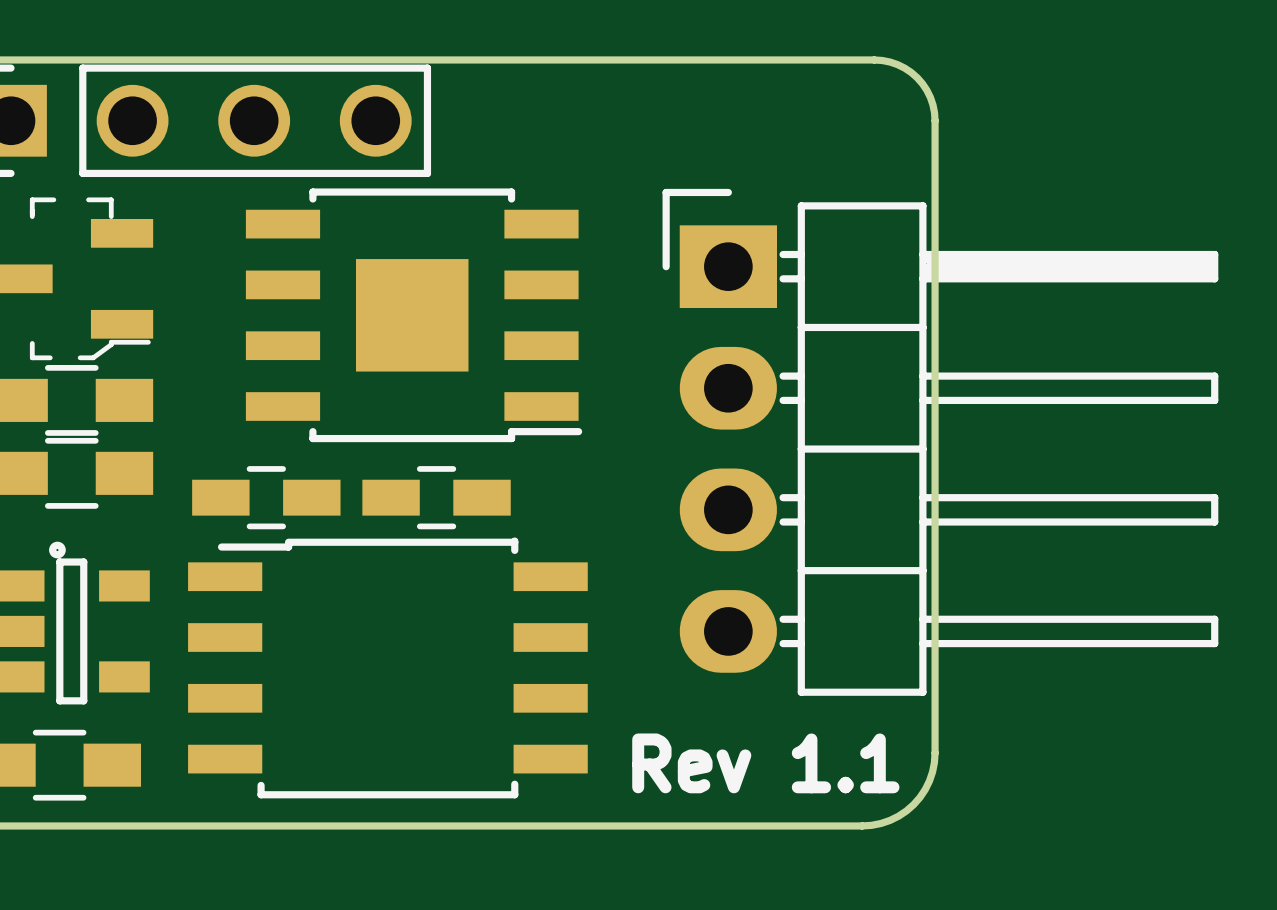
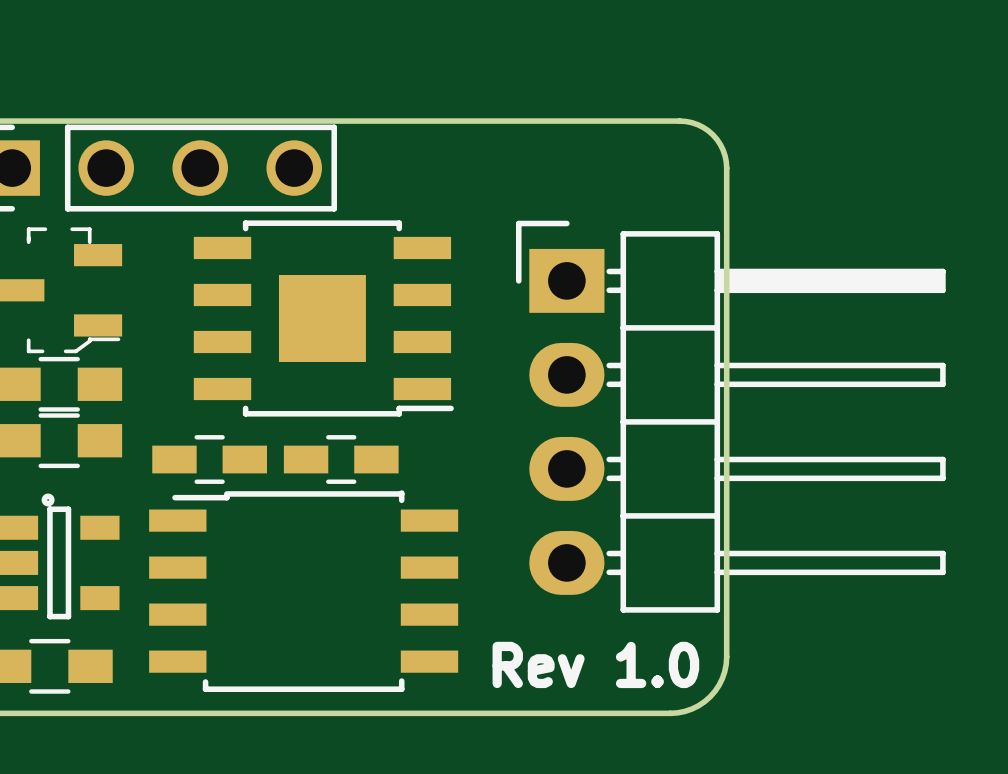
text: Rev 1.1 (765, 763) -> Rev 1.0 (595, 664)

